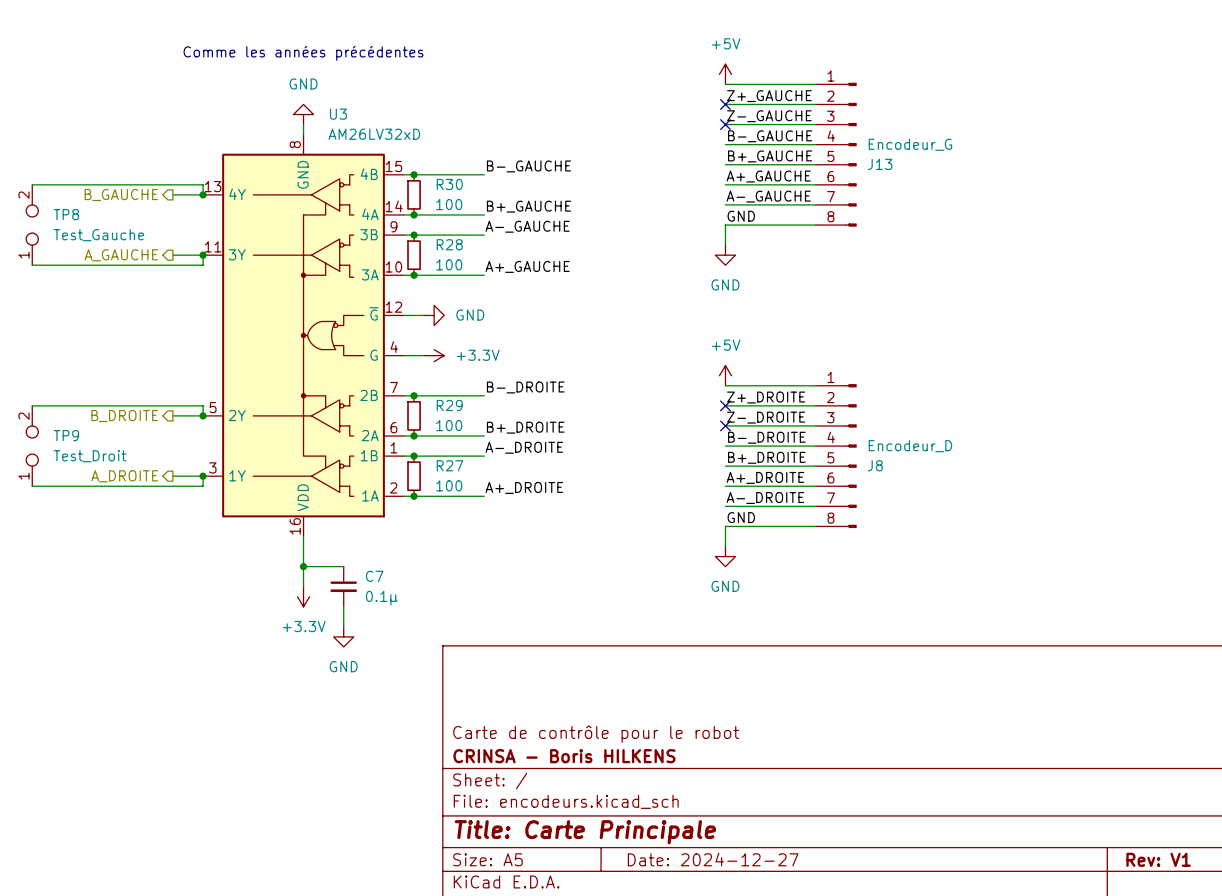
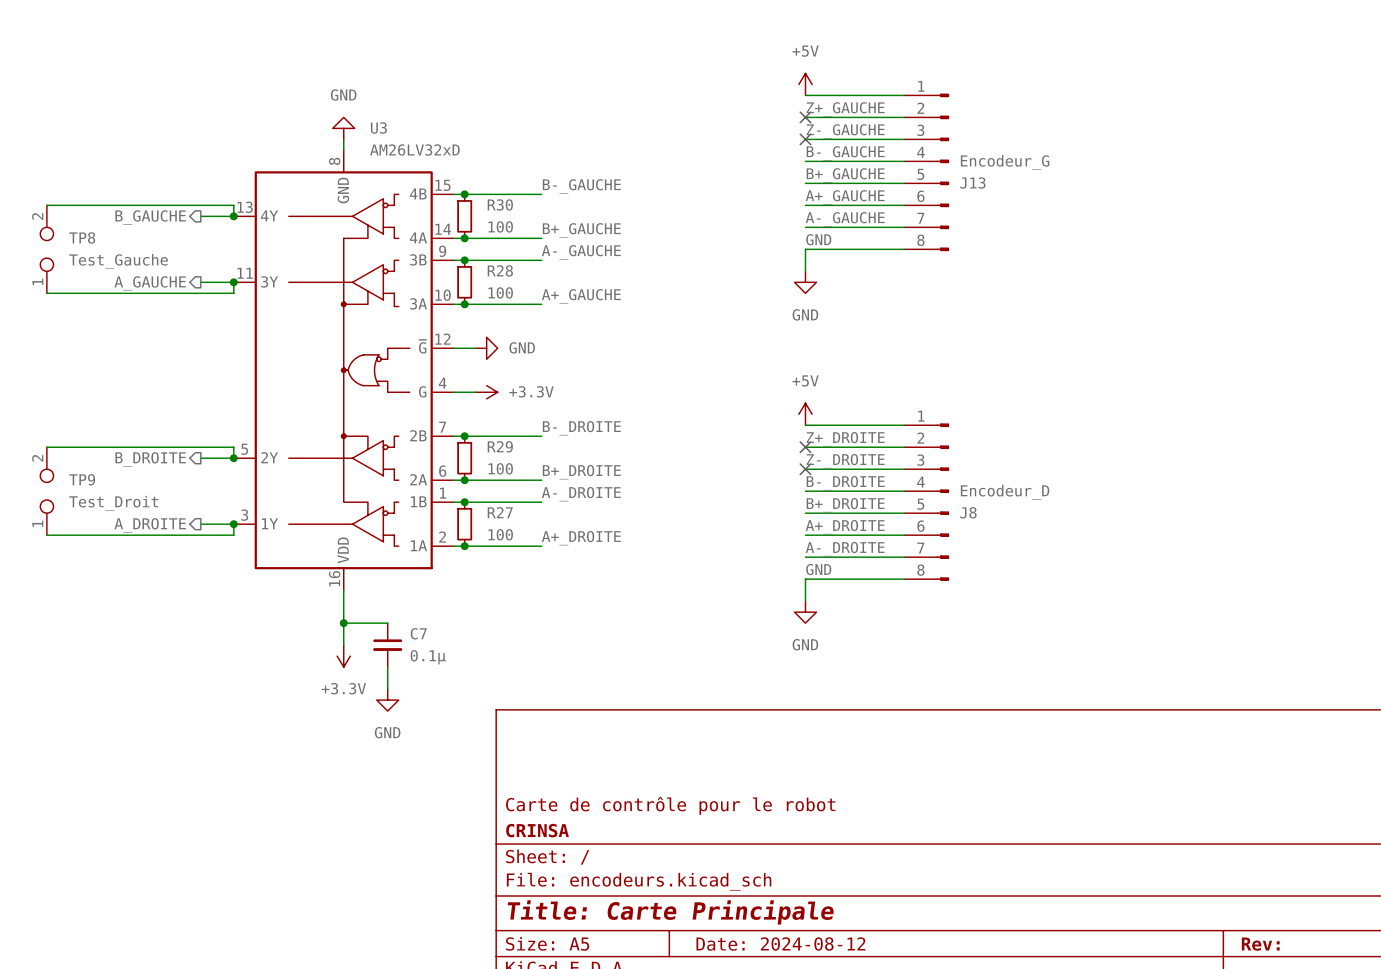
text: Comme les années précédentes (303, 53) -> none
title block: CRINSA - Boris HILKENS (564, 756) -> CRINSA (537, 830)
title block: Date: 2024-12-27 (713, 859) -> Date: 2024-08-12 (780, 944)
title block: Rev: V1 (1158, 859) -> Rev: (1260, 944)

